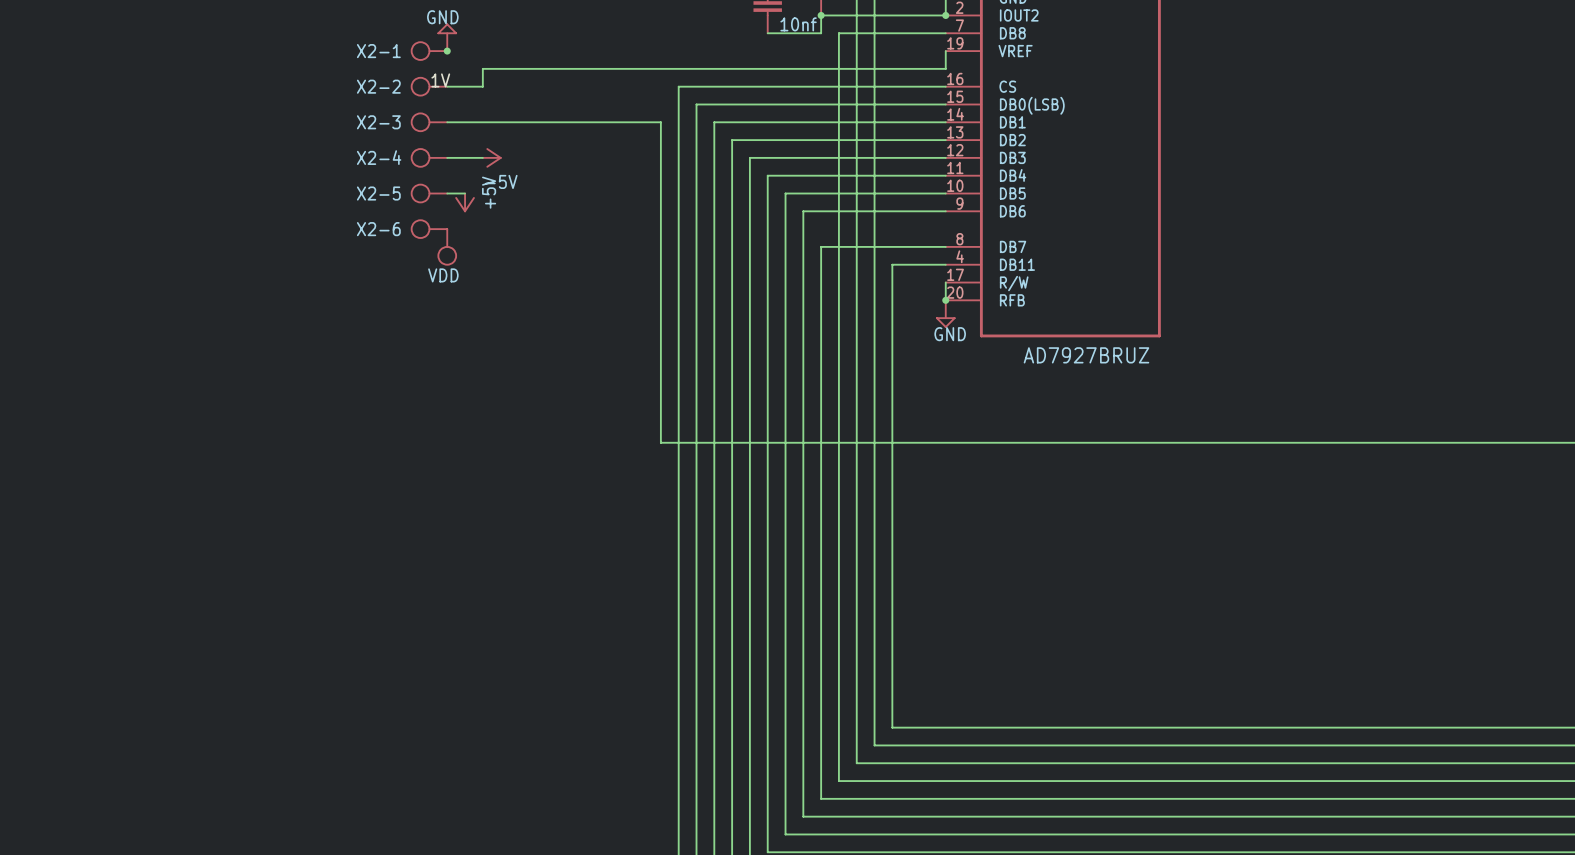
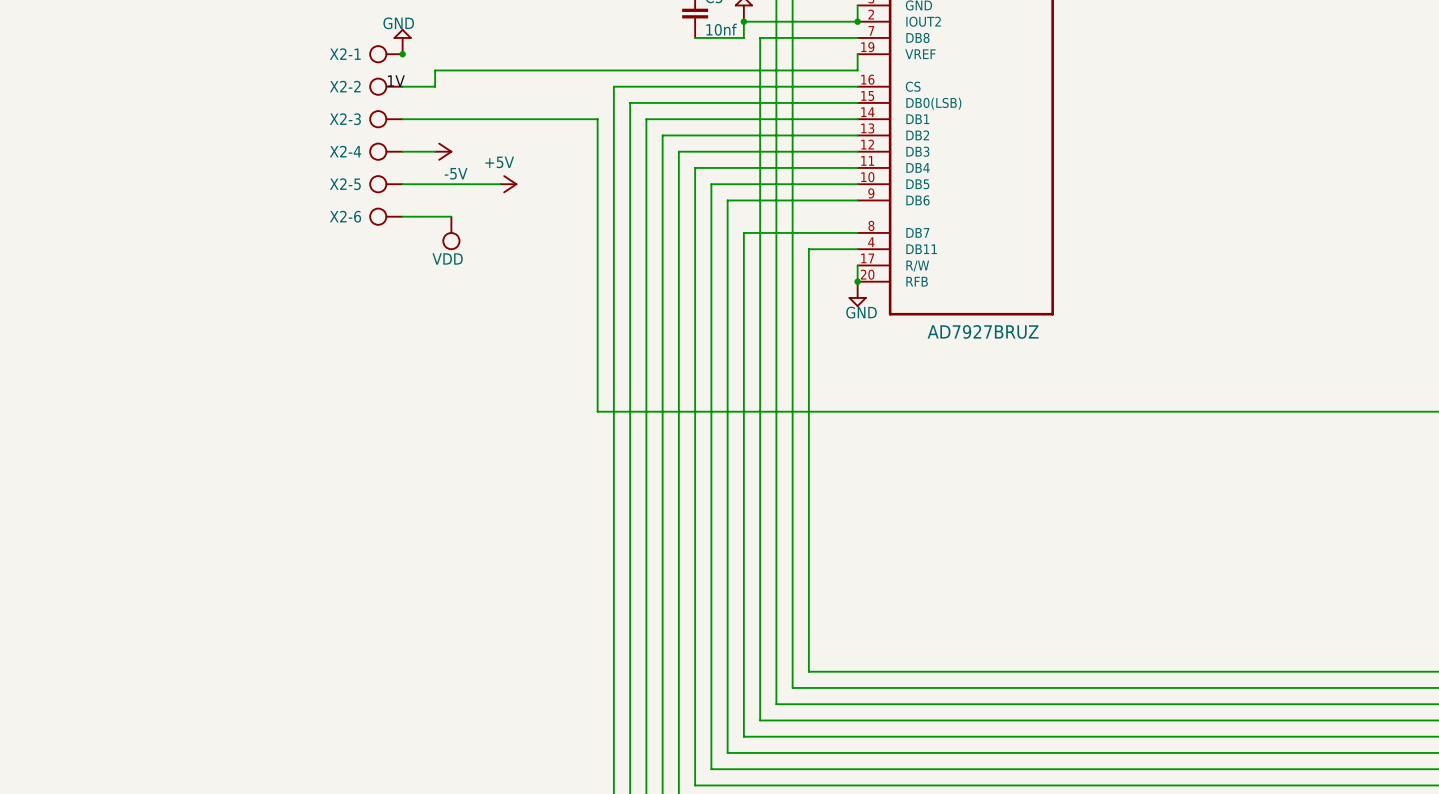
wire: none -> (418, 184) (500, 184)
power symbol position: +5V (465, 202) -> +5V (508, 184)
power symbol rotation: 0° (465, 204) -> 90° counterclockwise (510, 184)
wire: none -> (402, 216) (451, 216)
power symbol position: VDD (447, 247) -> VDD (451, 233)

